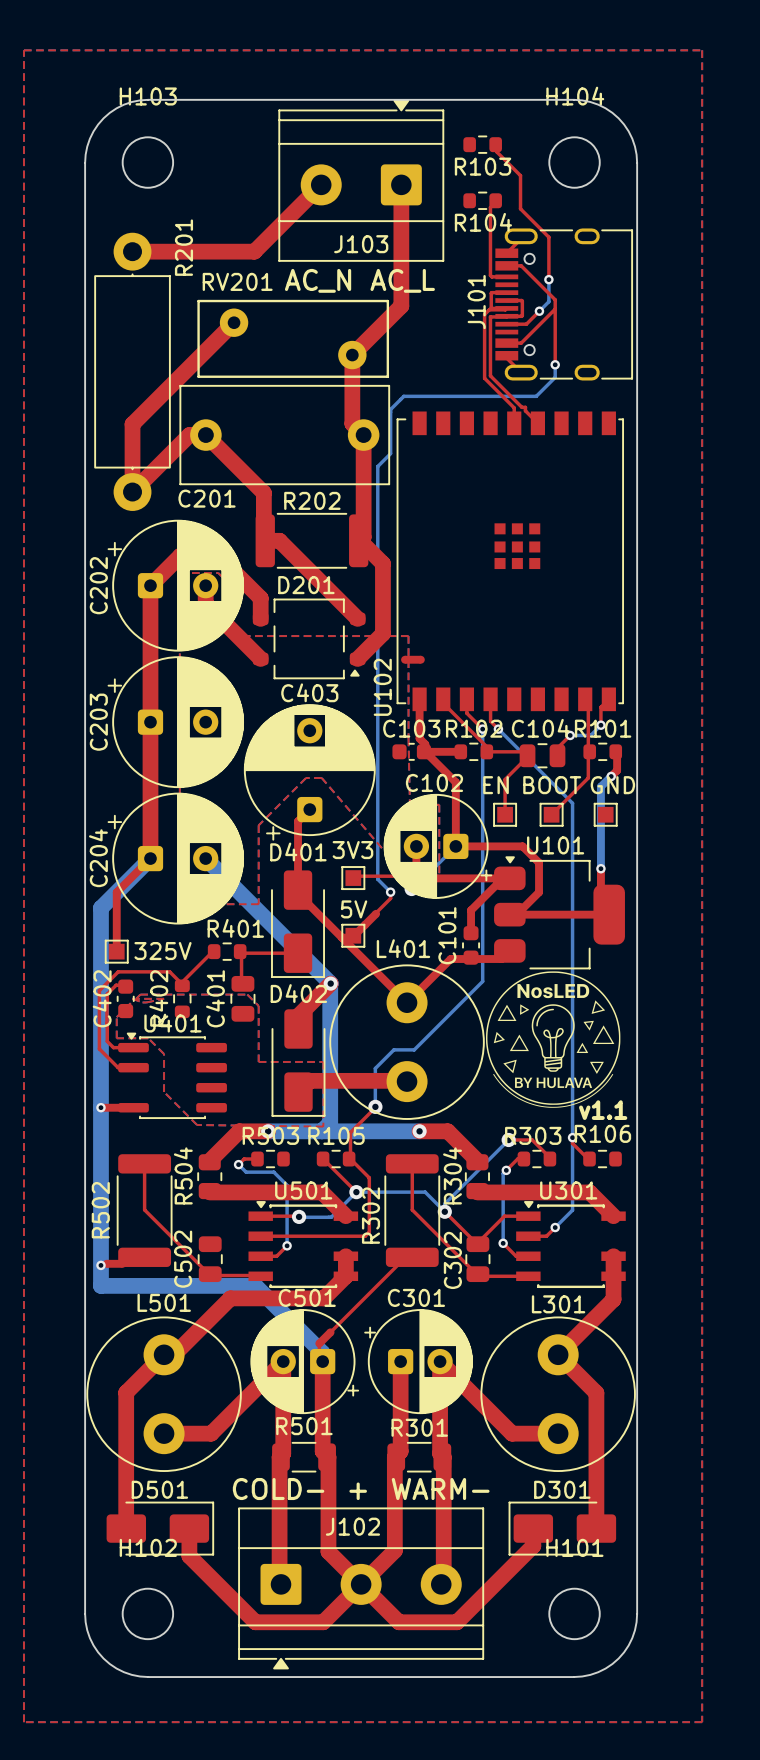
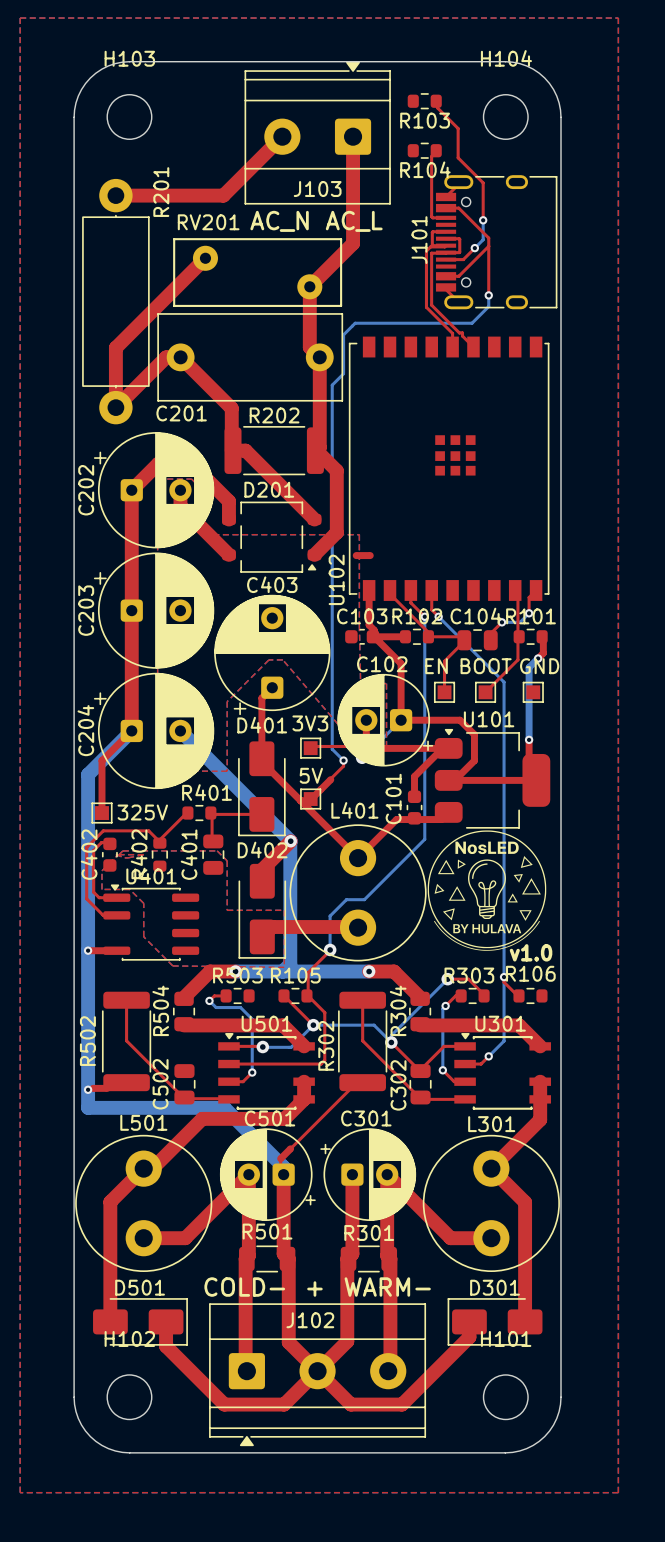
text: v1.1 (603, 1110) -> v1.0 (531, 952)

